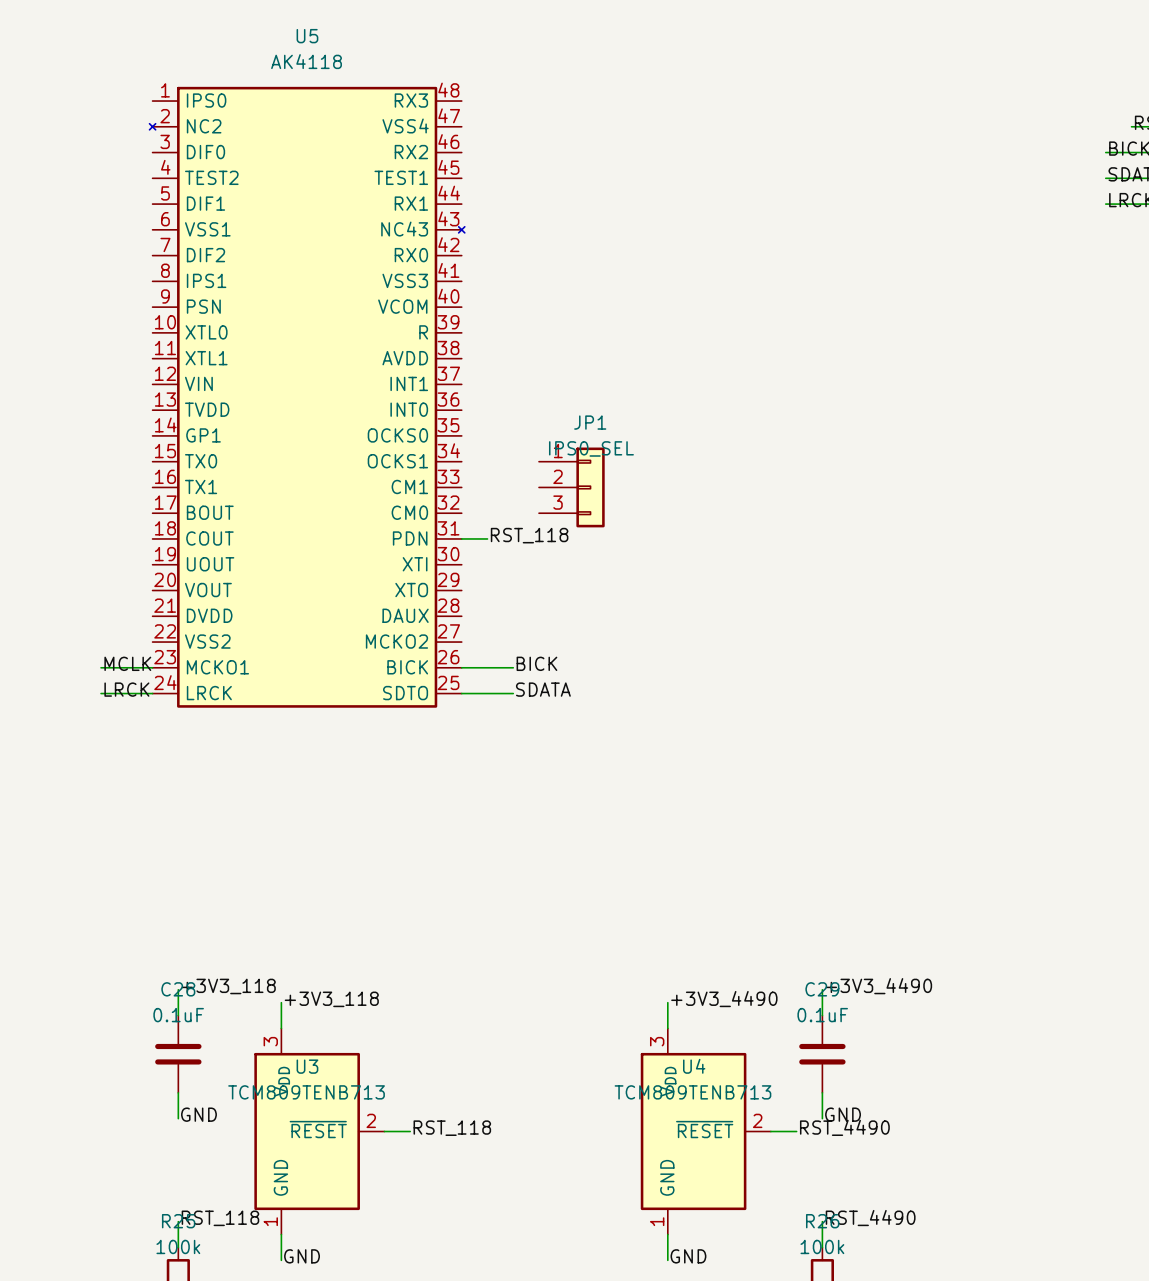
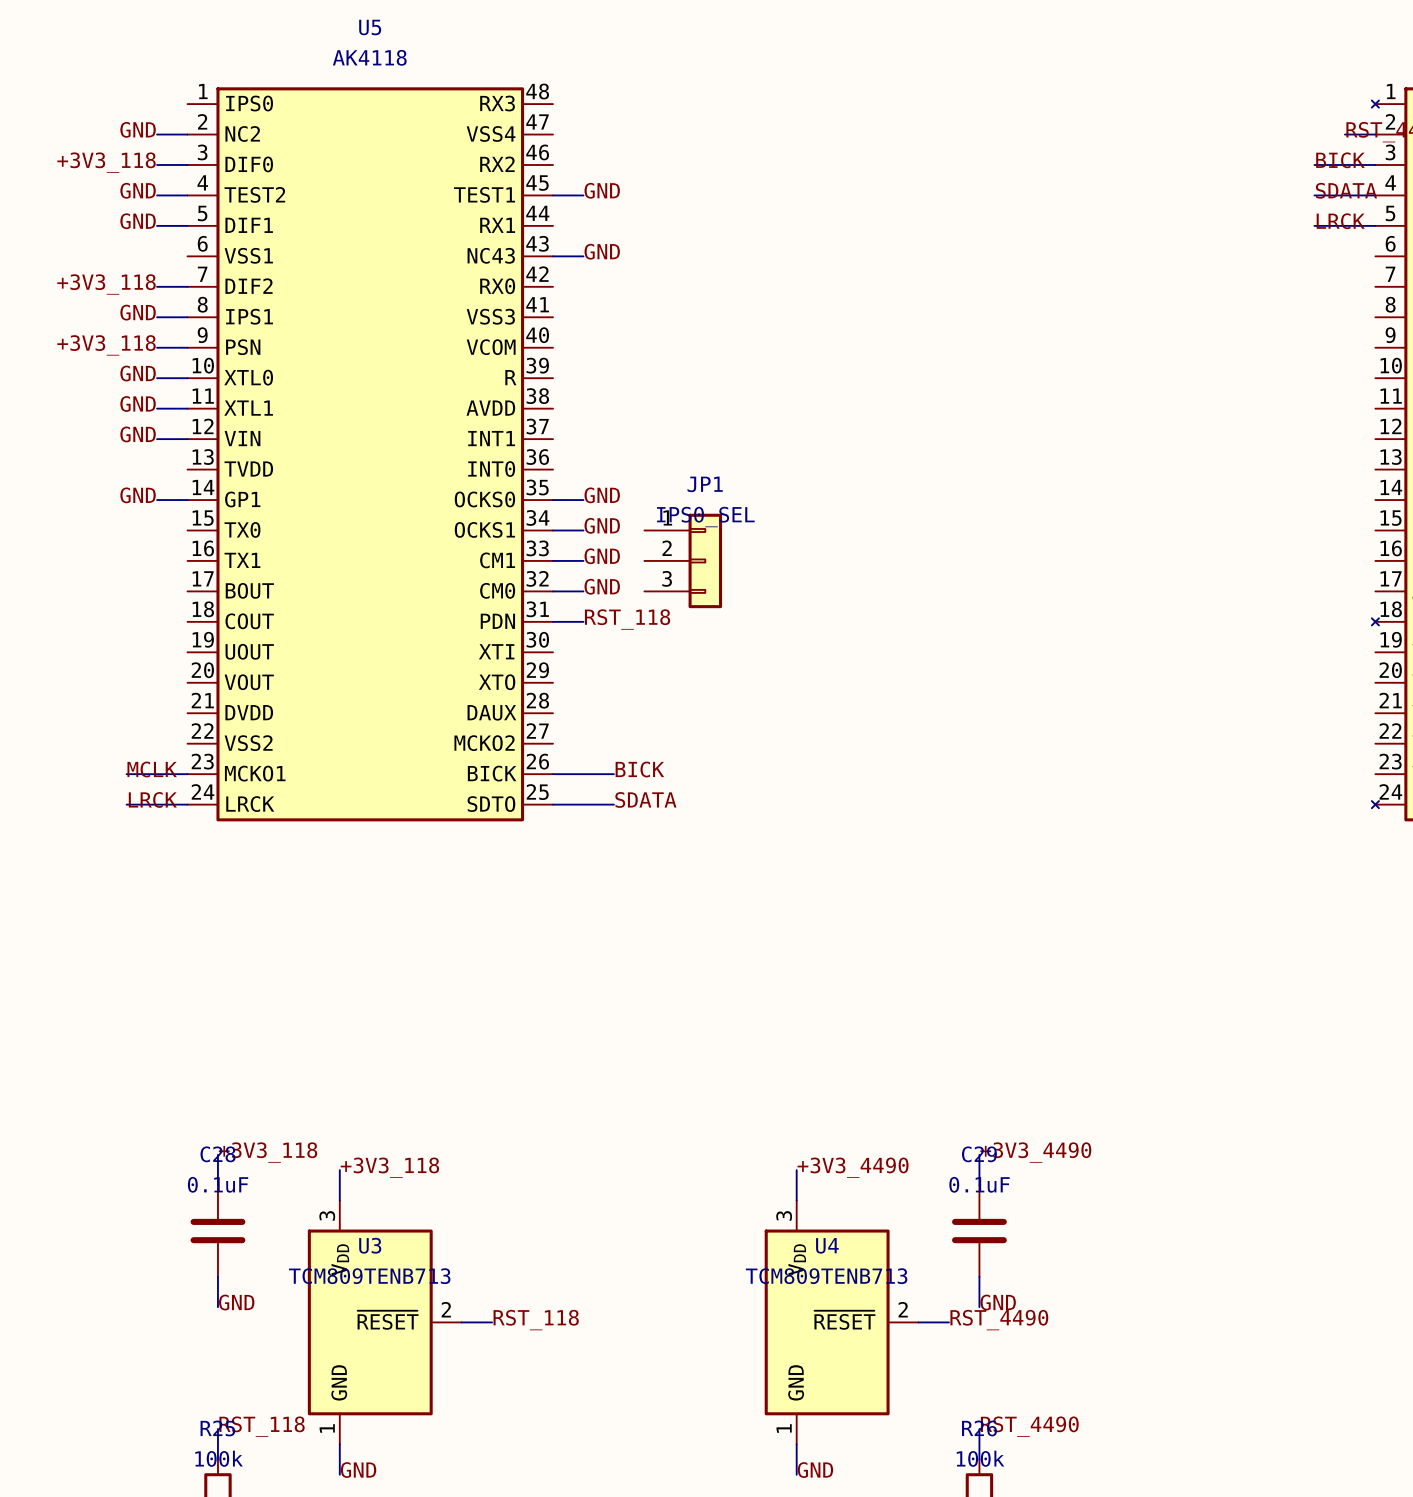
U5 symbol: [149, 86, 465, 708] -> [187, 87, 554, 822]
label: none -> GND (138, 129)
wire: none -> (157, 134) (187, 134)
label: none -> +3V3_118 (106, 162)
wire: none -> (157, 164) (187, 164)
label: none -> GND (138, 190)
label: none -> GND (602, 190)
wire: none -> (157, 195) (187, 195)
wire: none -> (553, 195) (583, 195)
label: none -> GND (138, 221)
wire: none -> (157, 225) (187, 225)
label: none -> GND (602, 251)
wire: none -> (553, 256) (583, 256)
label: none -> +3V3_118 (106, 284)
wire: none -> (157, 286) (187, 286)
label: none -> GND (138, 312)
wire: none -> (157, 317) (187, 317)
label: none -> +3V3_118 (106, 345)
wire: none -> (157, 347) (187, 347)
label: none -> GND (138, 373)
wire: none -> (157, 378) (187, 378)
label: none -> GND (138, 403)
wire: none -> (157, 408) (187, 408)
label: none -> GND (138, 434)
wire: none -> (157, 439) (187, 439)
label: none -> GND (138, 495)
label: none -> GND (602, 495)
wire: none -> (157, 500) (187, 500)
wire: none -> (553, 500) (583, 500)
label: none -> GND (602, 525)
wire: none -> (553, 530) (583, 530)
label: none -> GND (602, 556)
wire: none -> (553, 560) (583, 560)
label: none -> GND (602, 586)
wire: none -> (553, 591) (583, 591)

